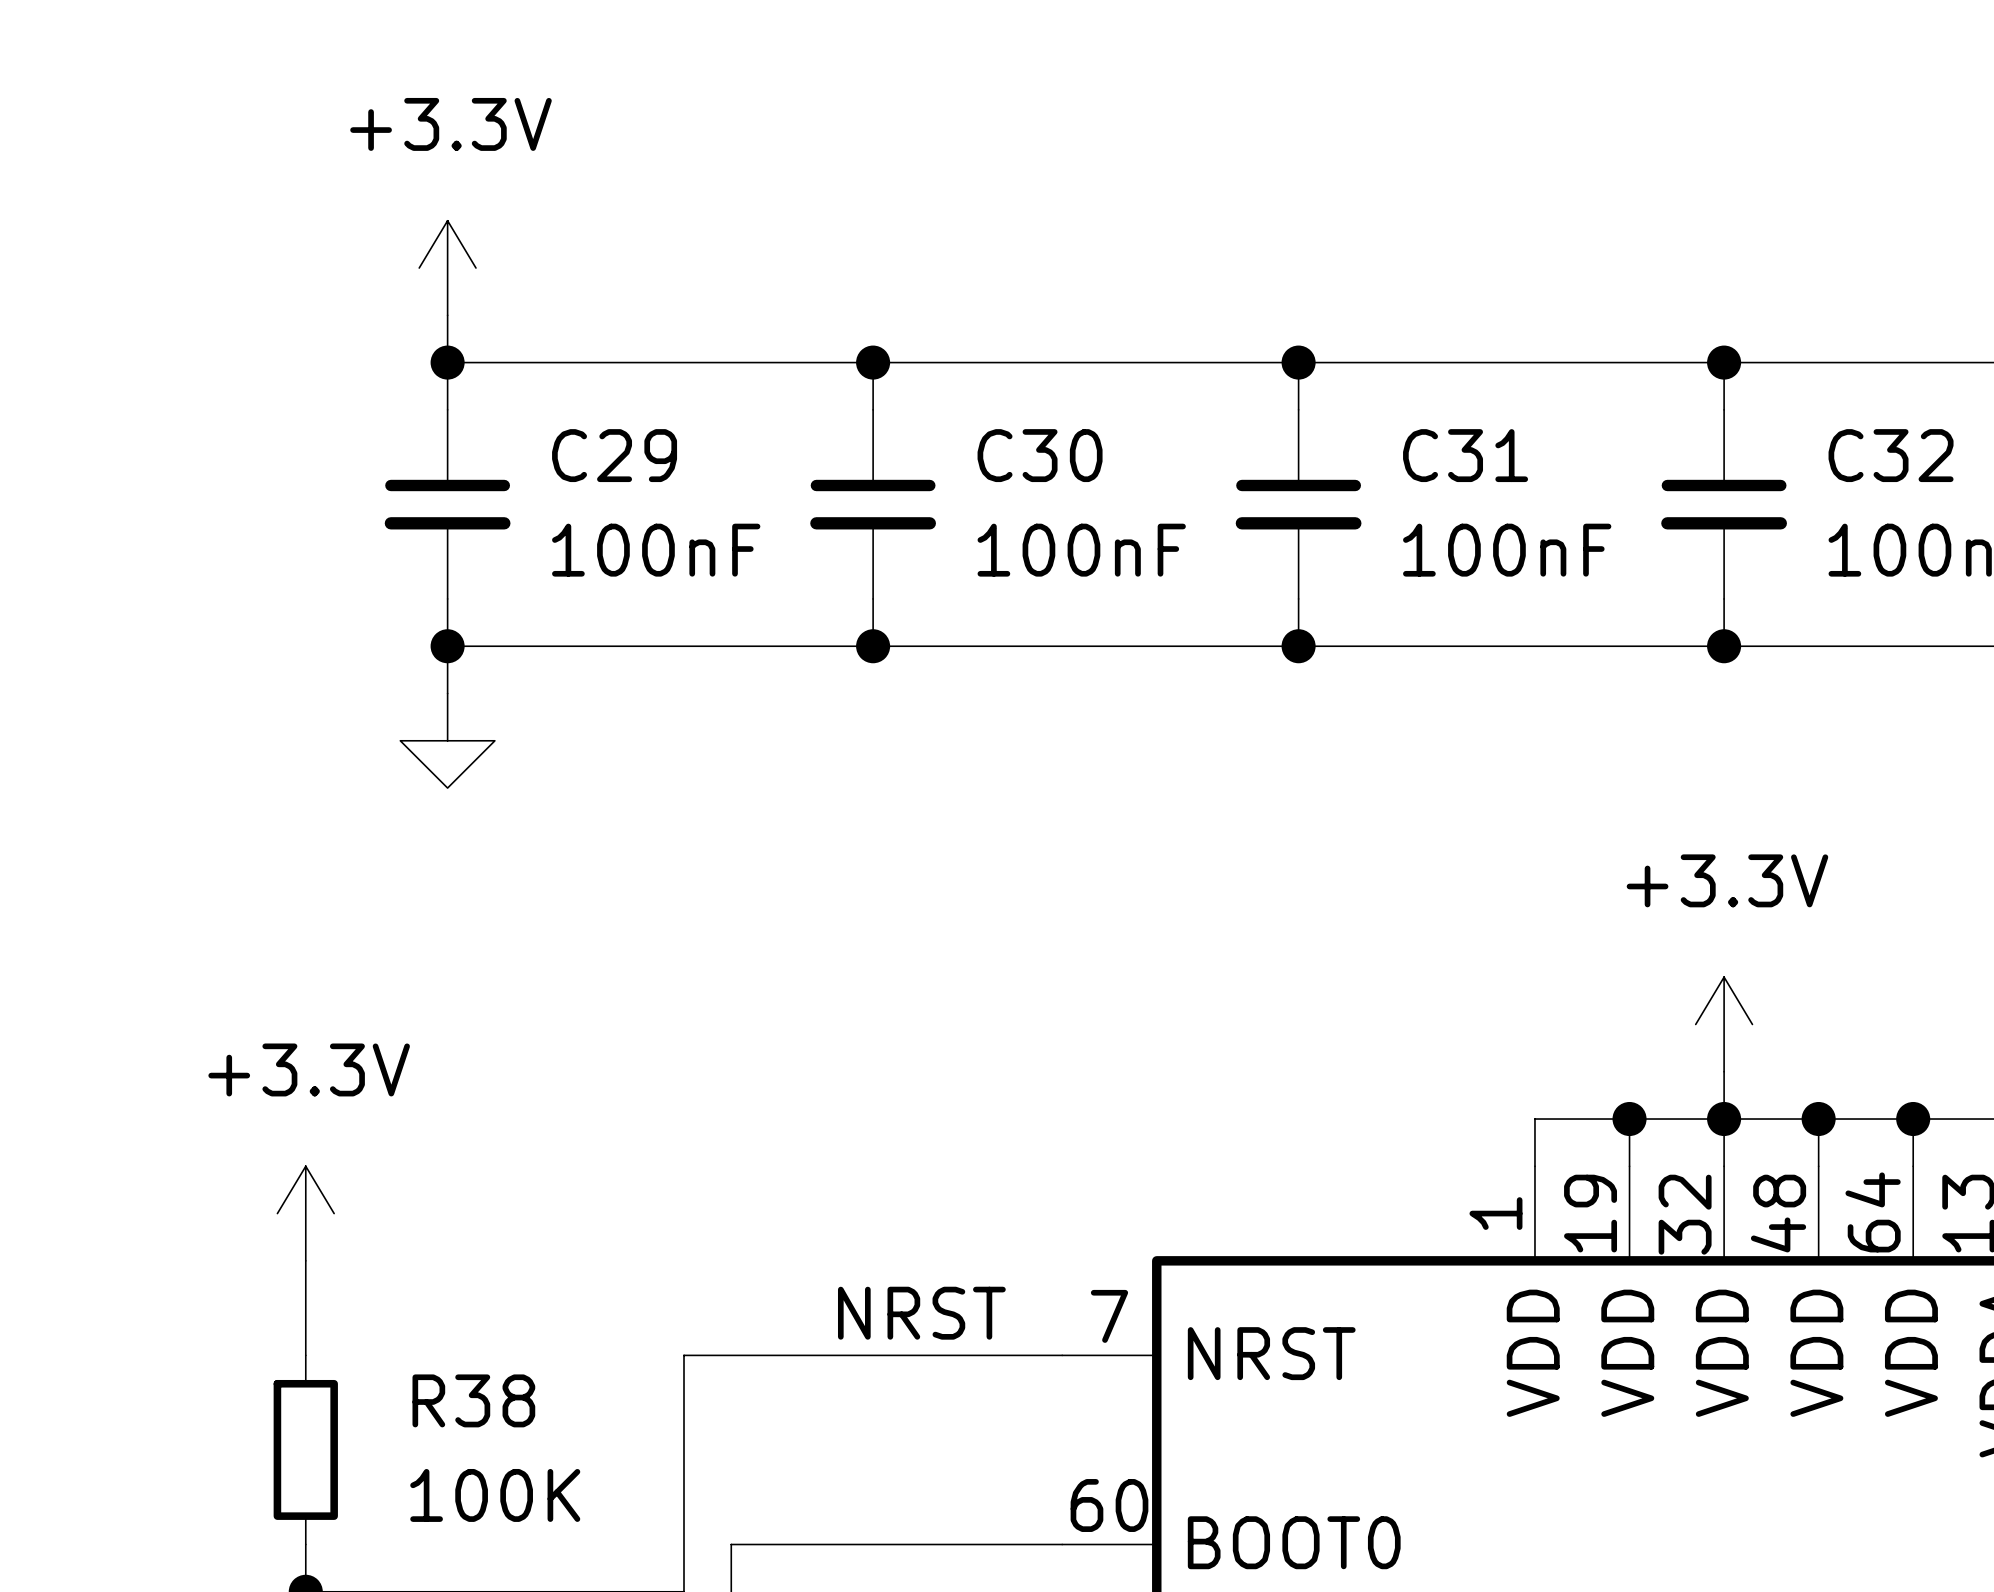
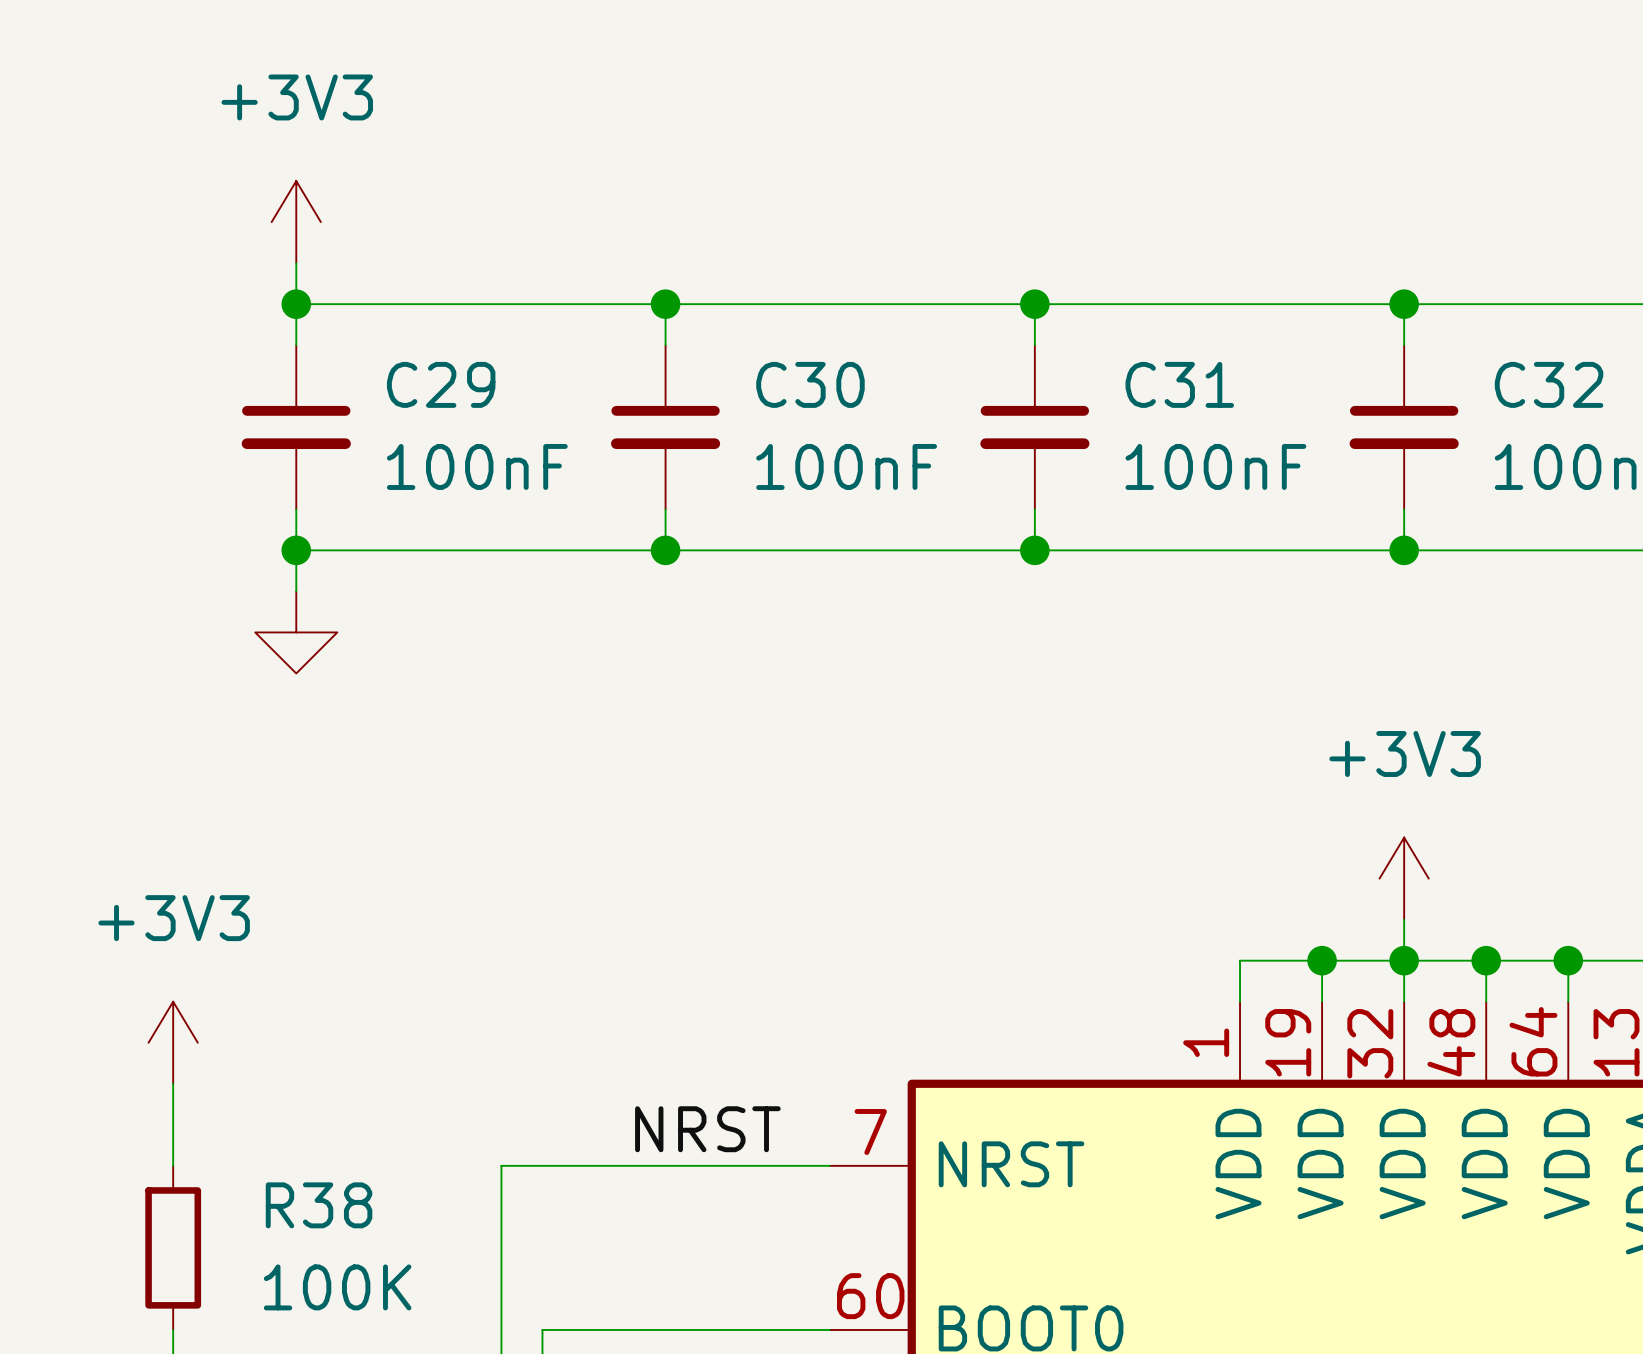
power symbol: +3.3V (447, 268) -> +3V3 (296, 222)
power symbol: +3.3V (1724, 1024) -> +3V3 (1404, 878)
power symbol: +3.3V (305, 1213) -> +3V3 (173, 1042)

